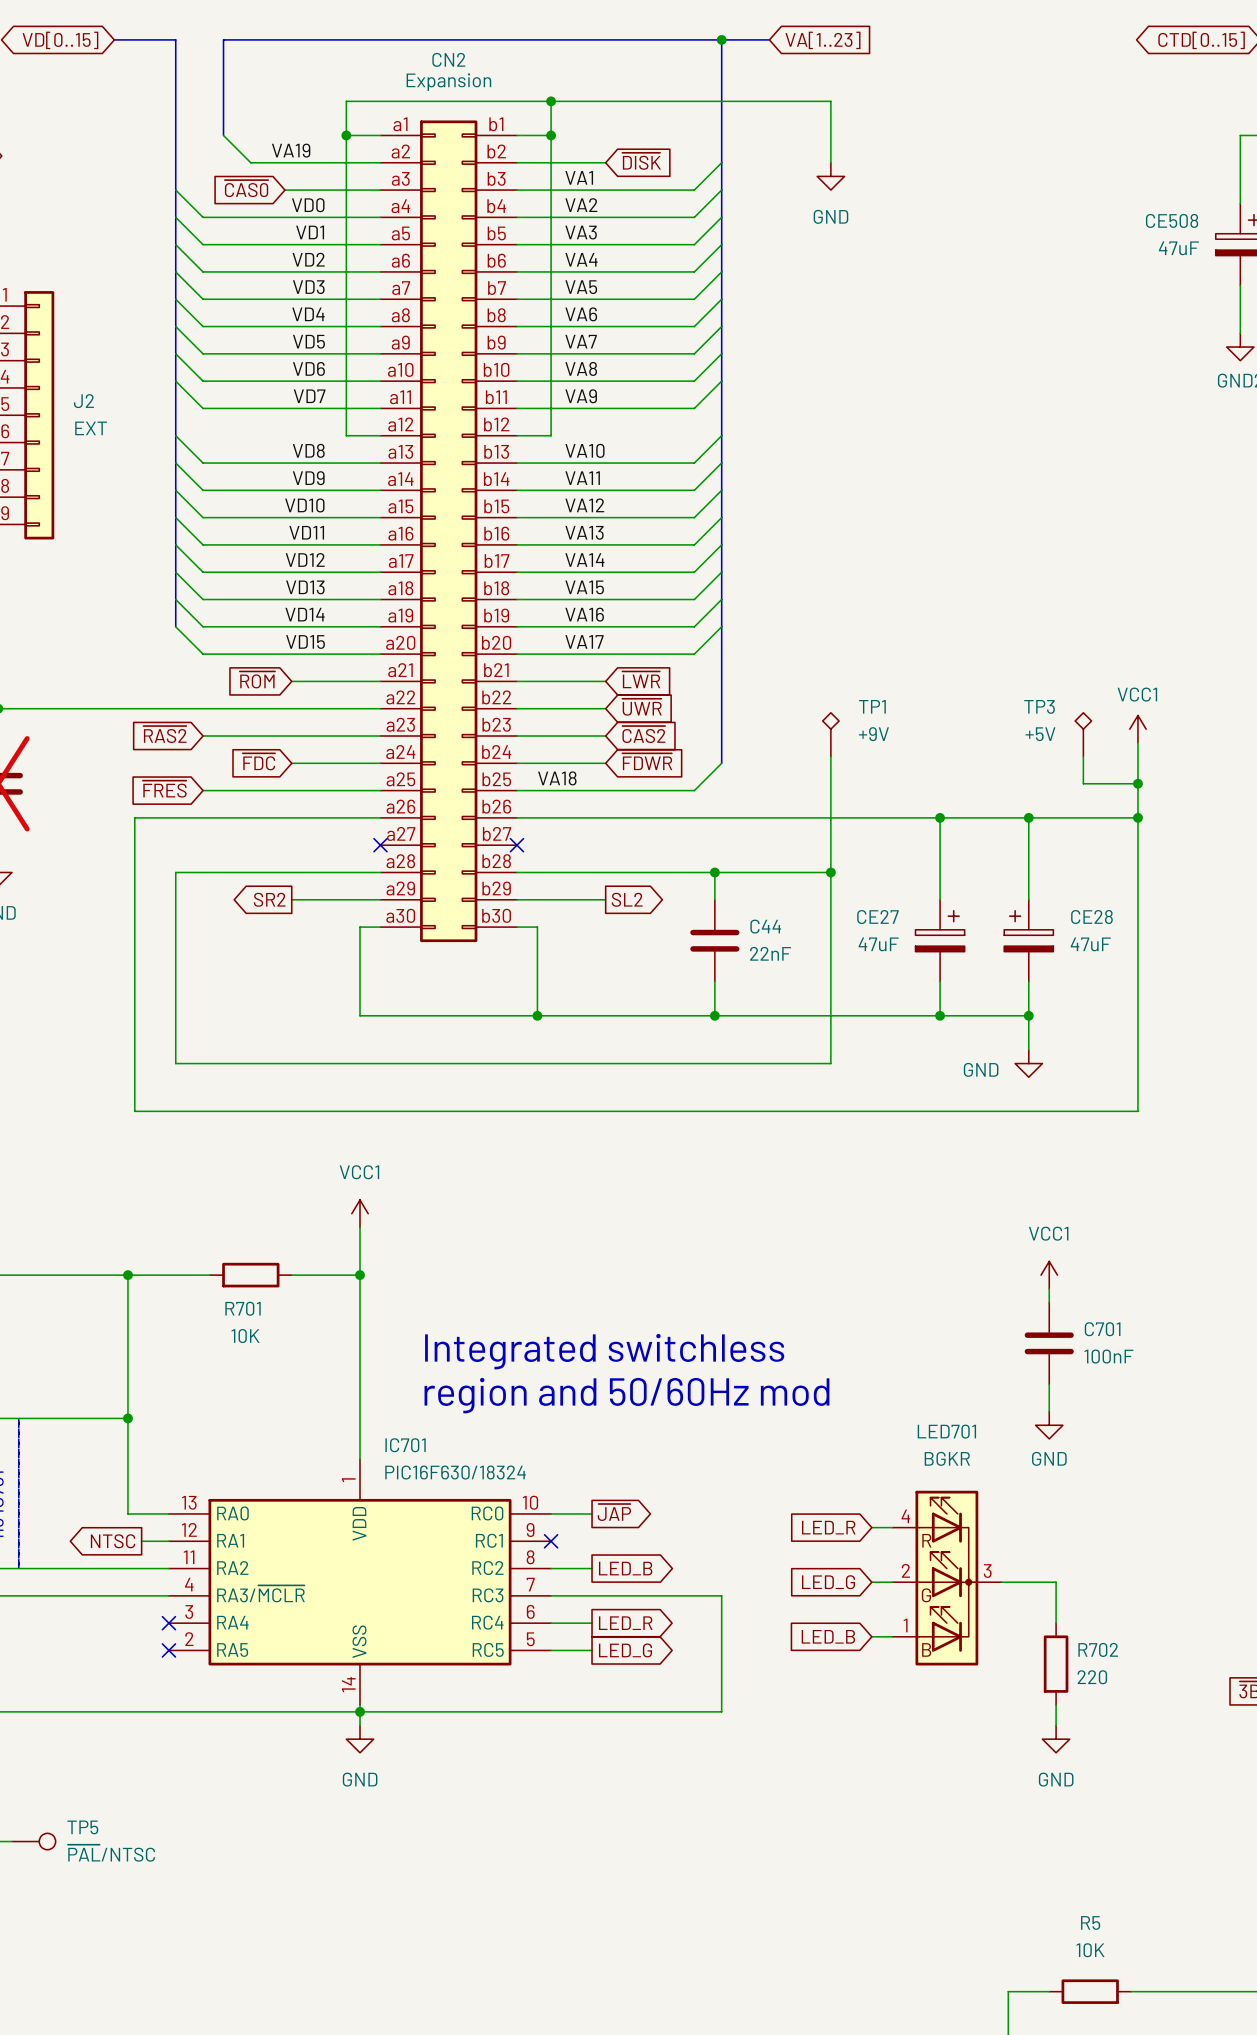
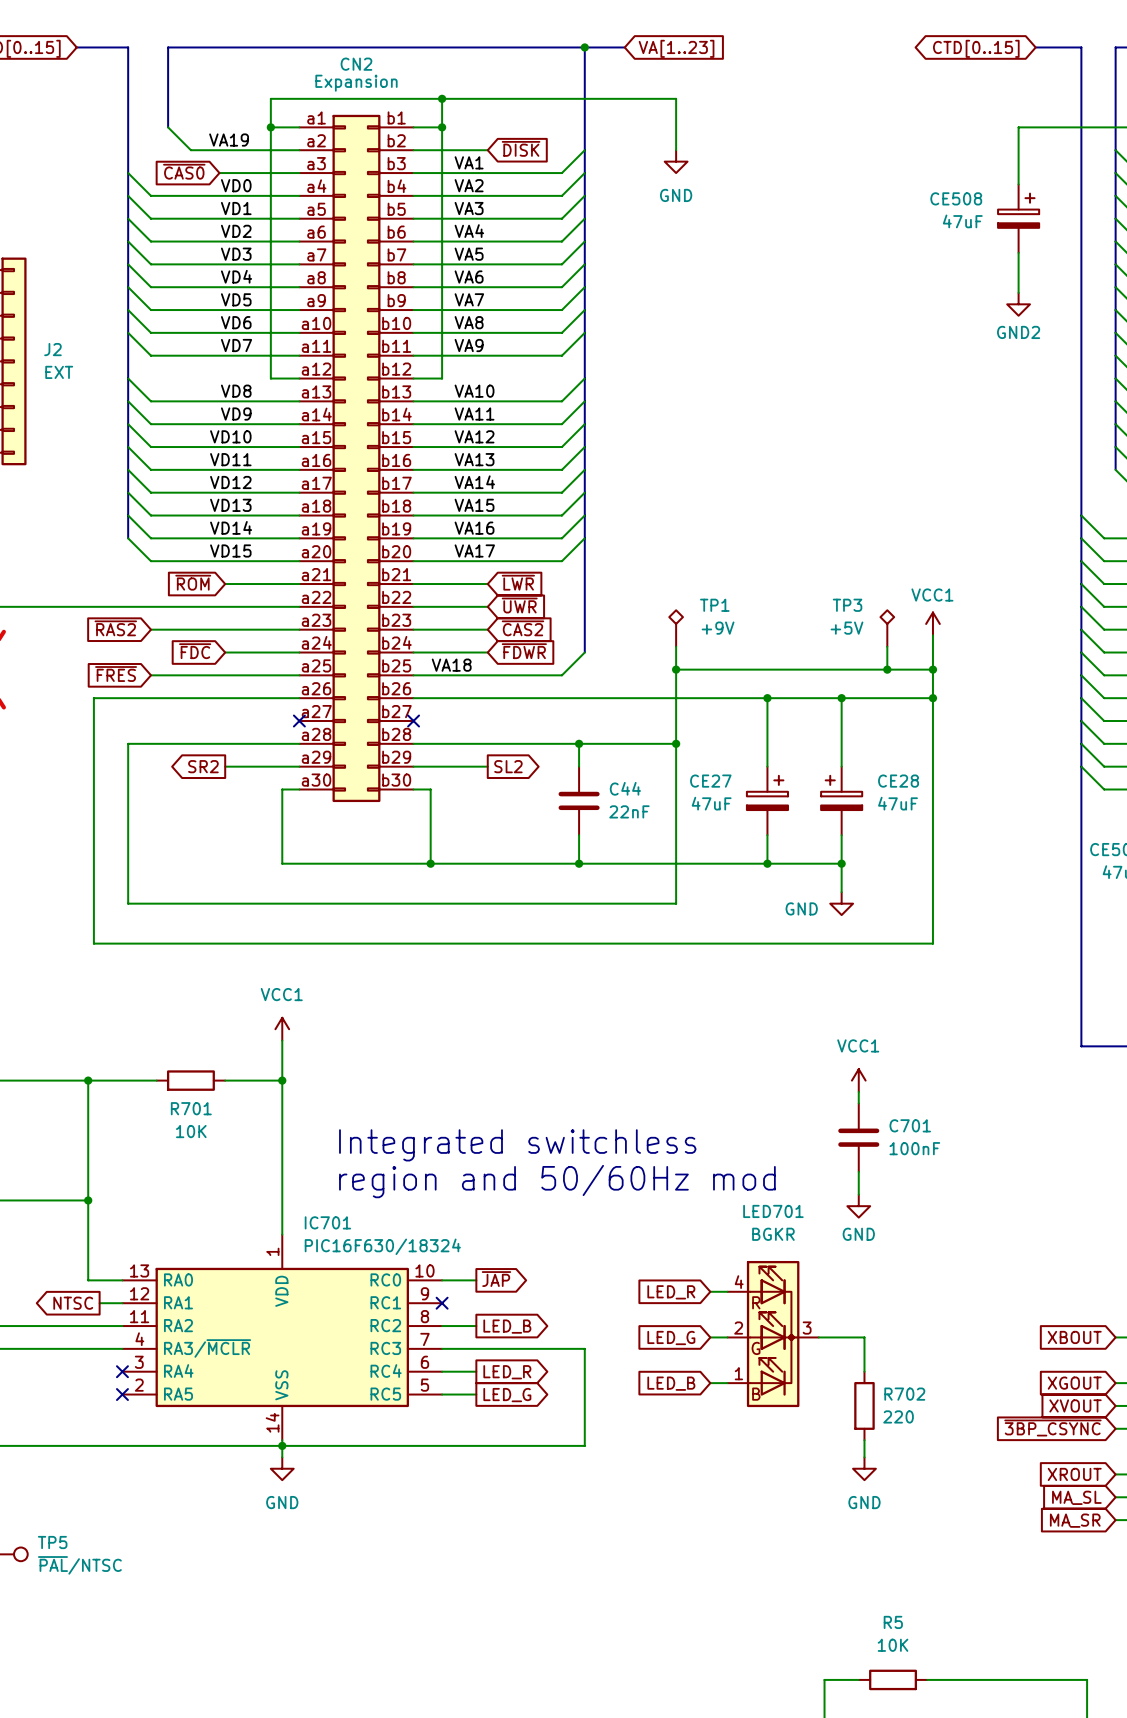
wire: none -> (676, 669) (887, 669)
junction: none -> (676, 669)
junction: none -> (887, 669)

